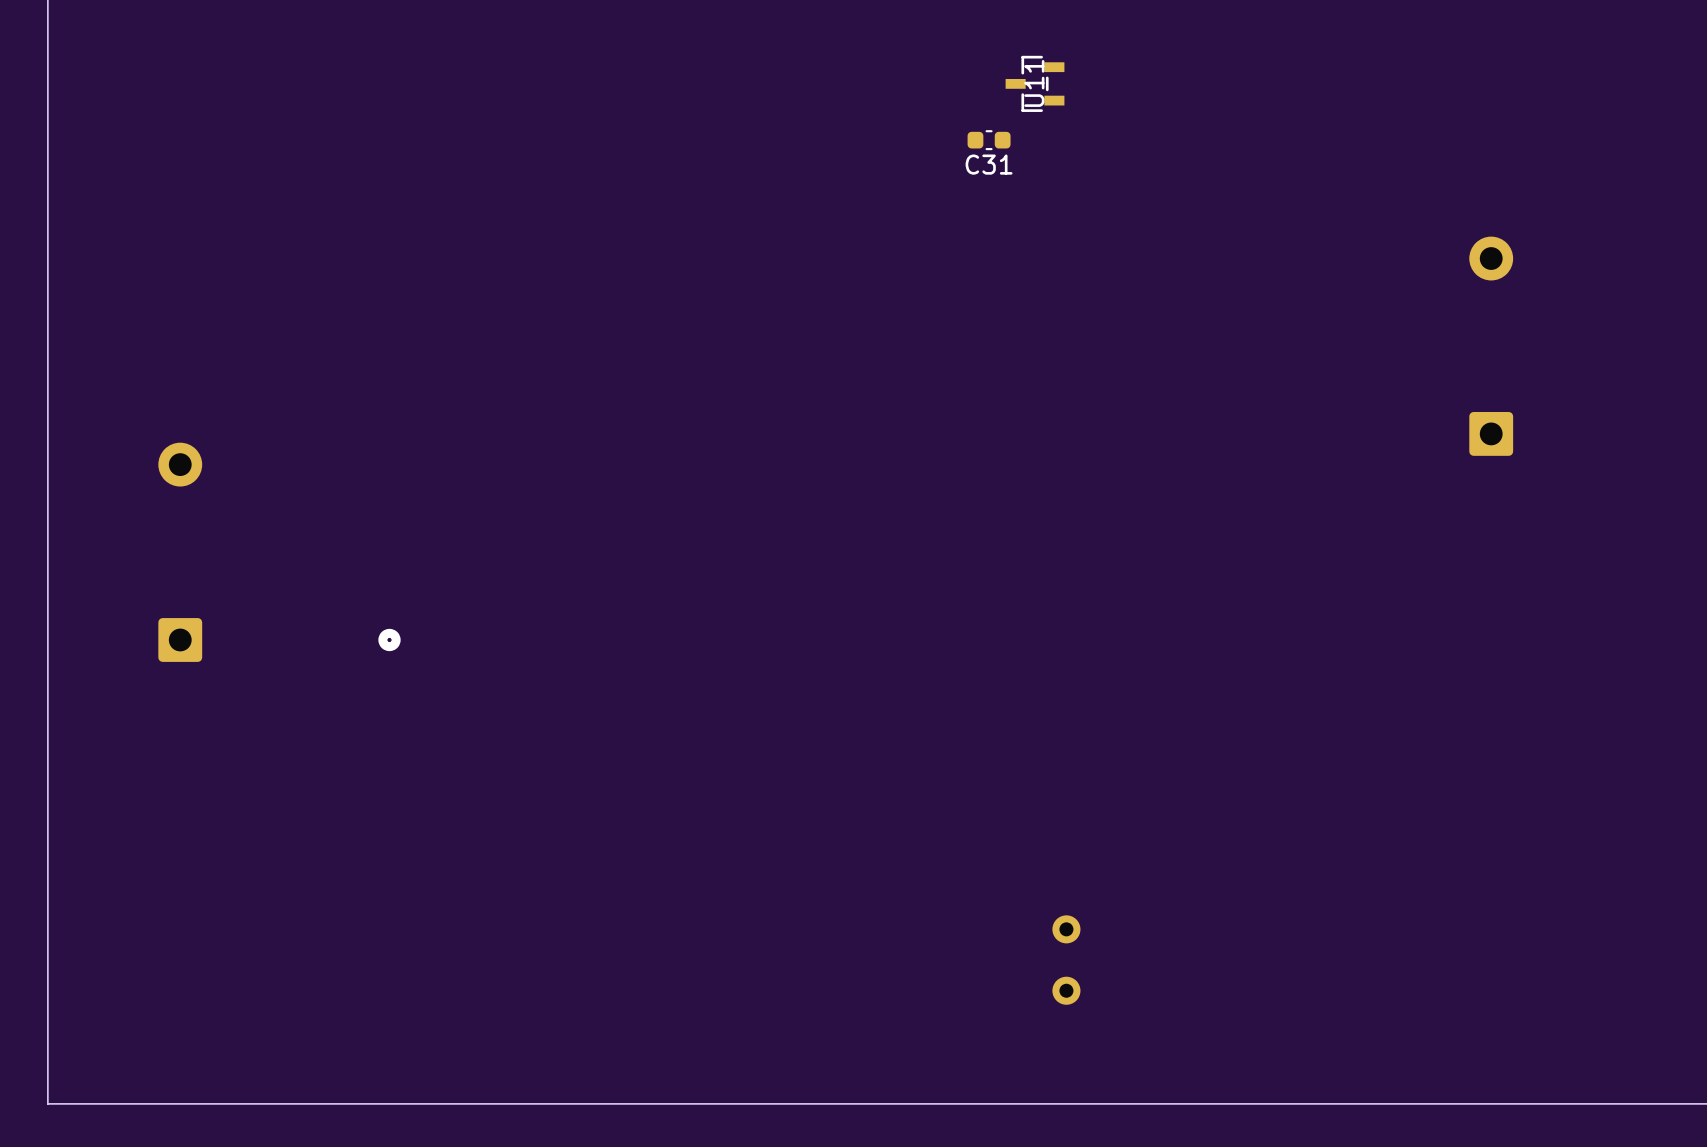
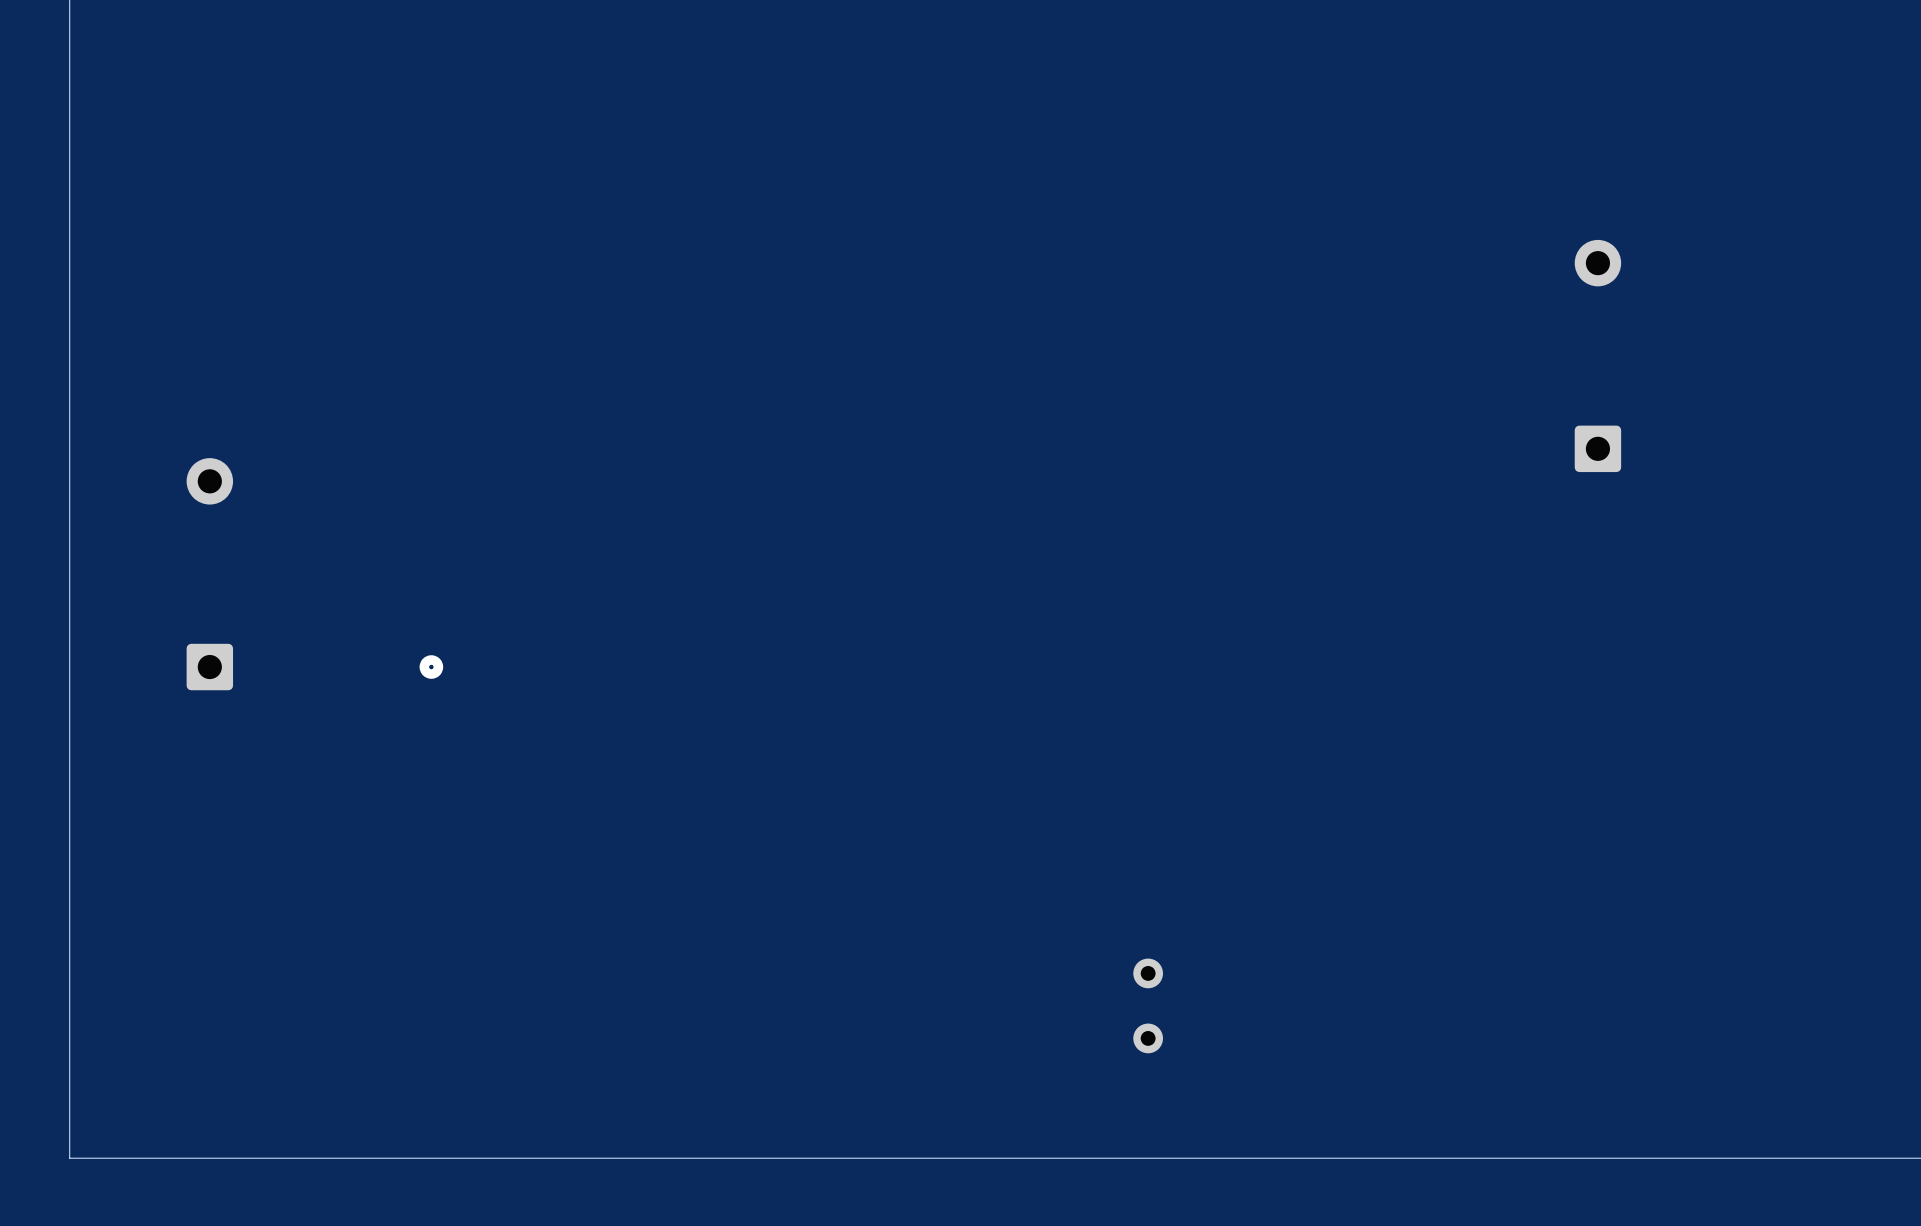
U11: (1035, 83) -> none
C31: (989, 140) -> none

